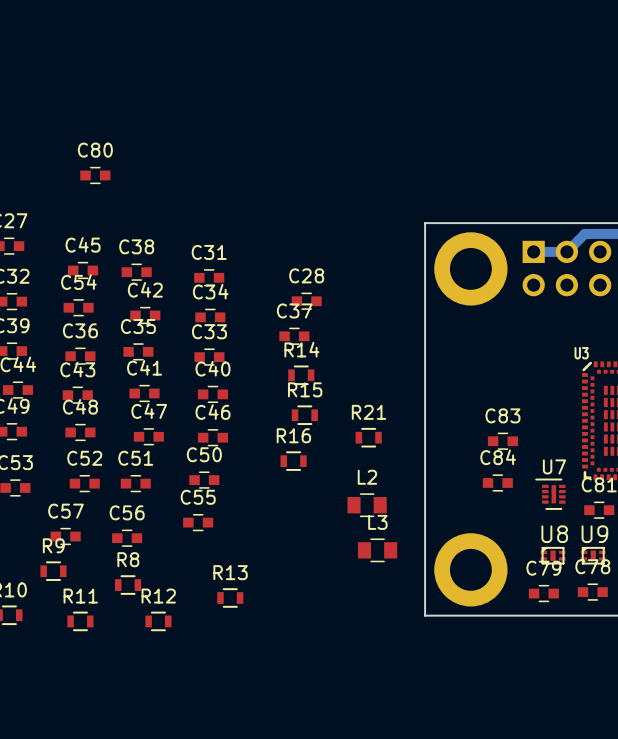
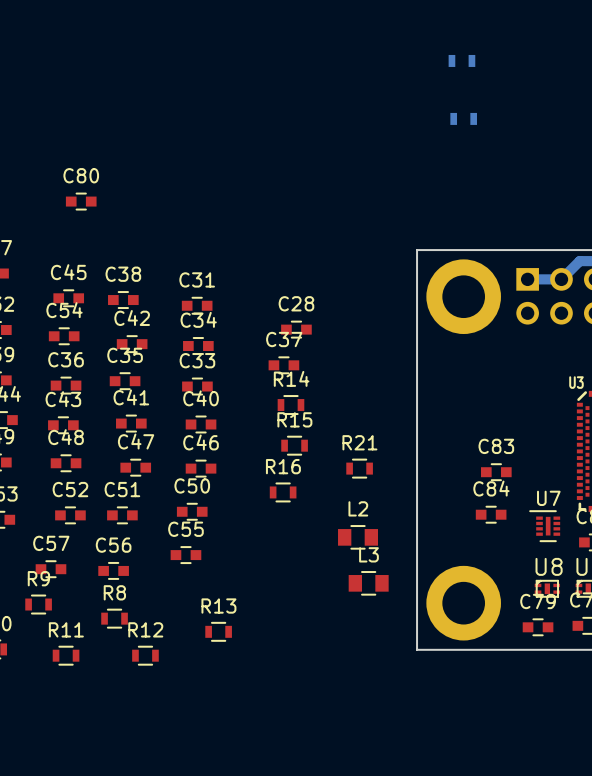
part: none -> (461, 60)
part: none -> (463, 118)

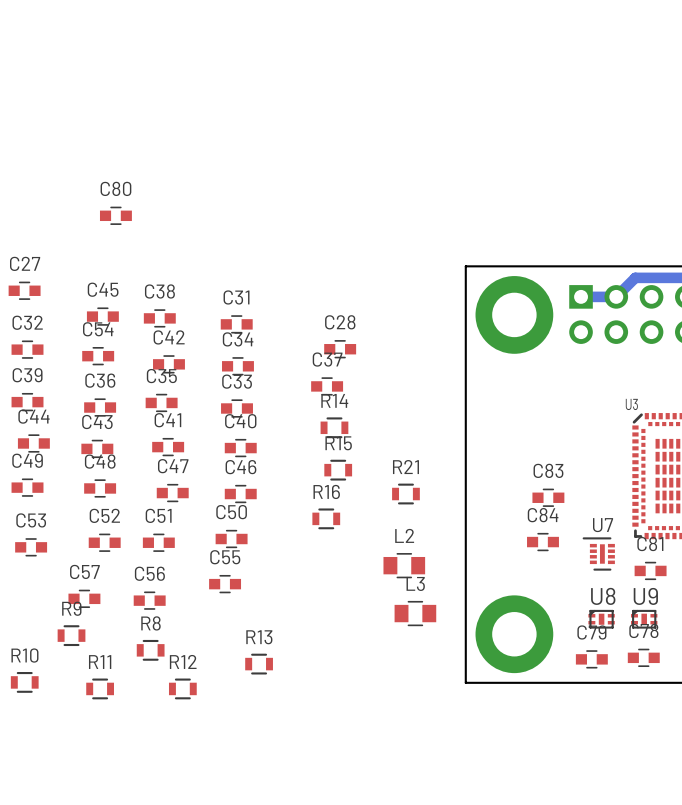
part: (461, 60) -> none
part: (463, 118) -> none

